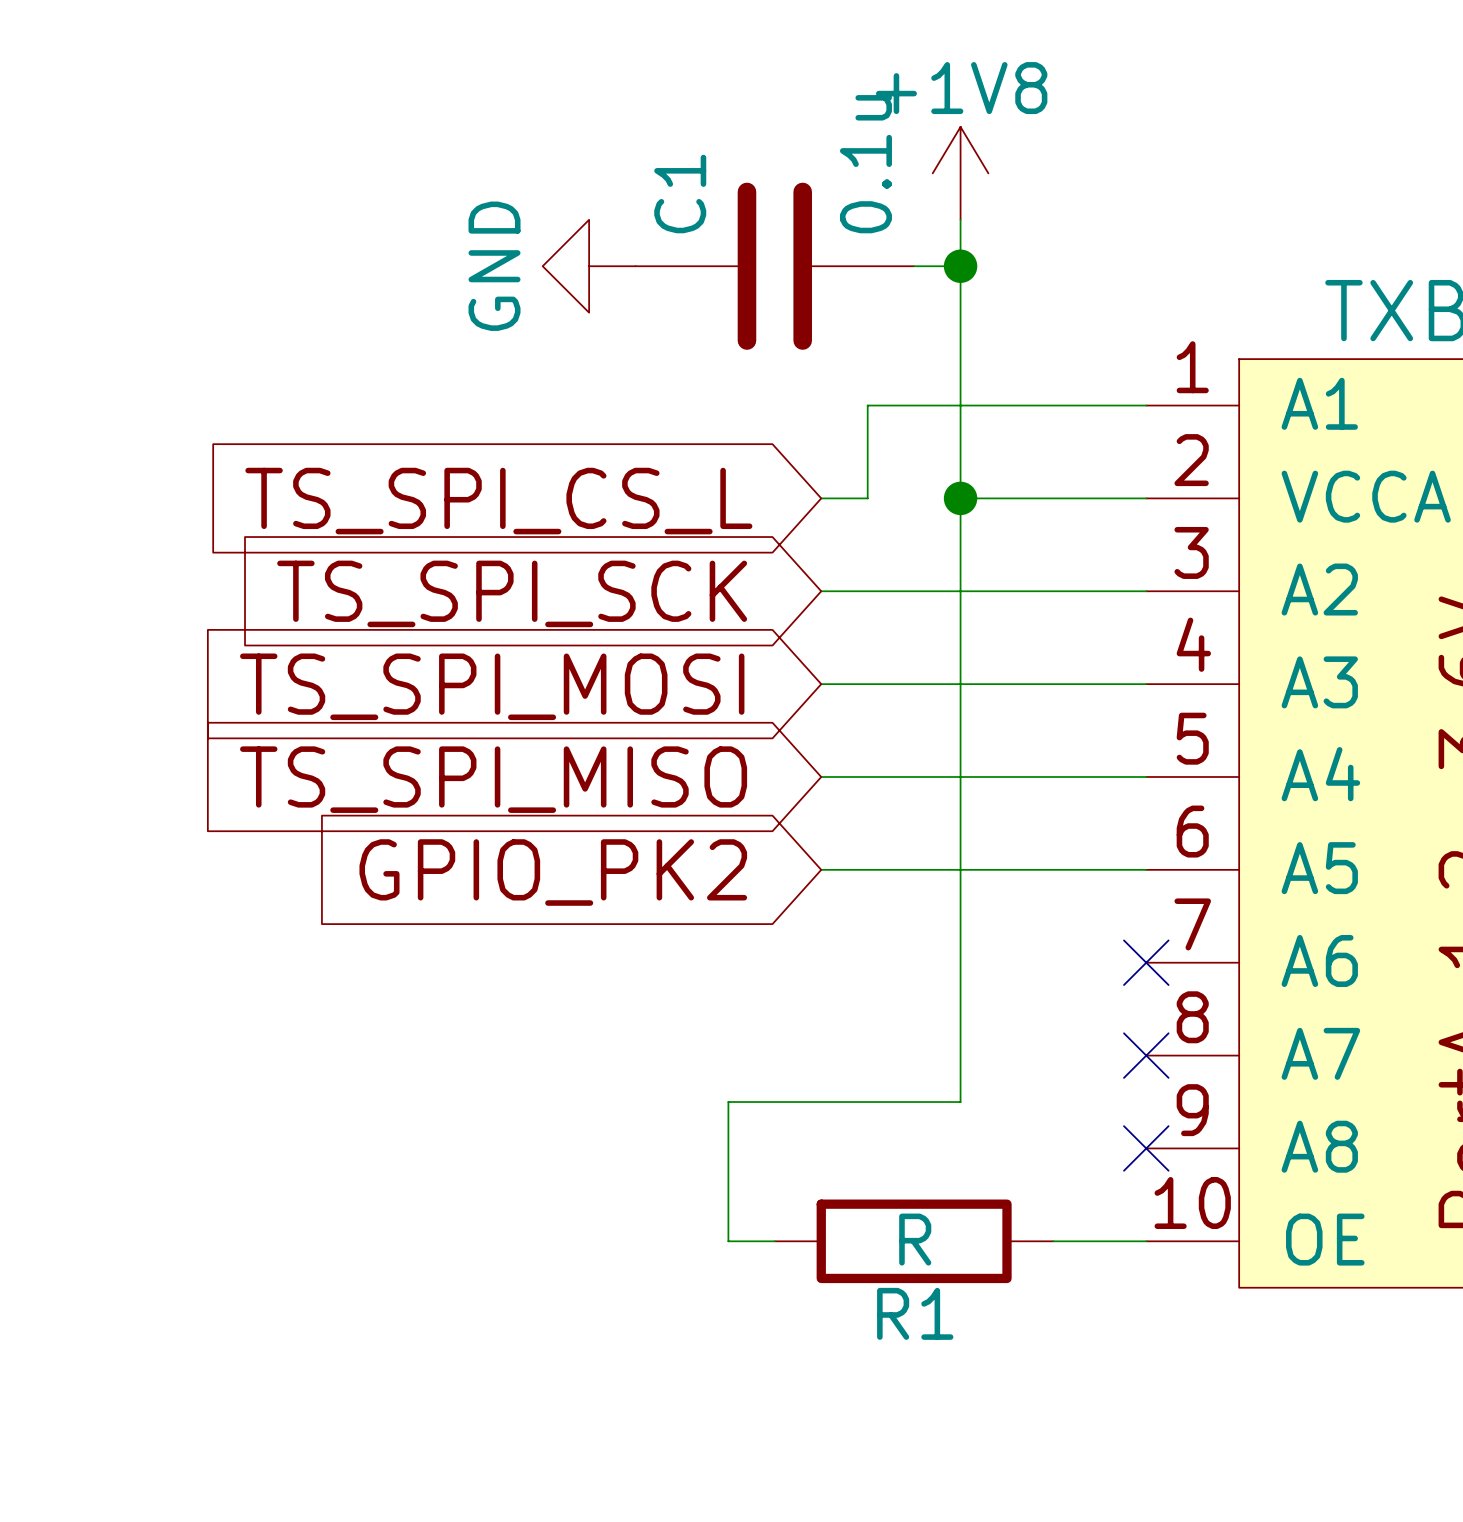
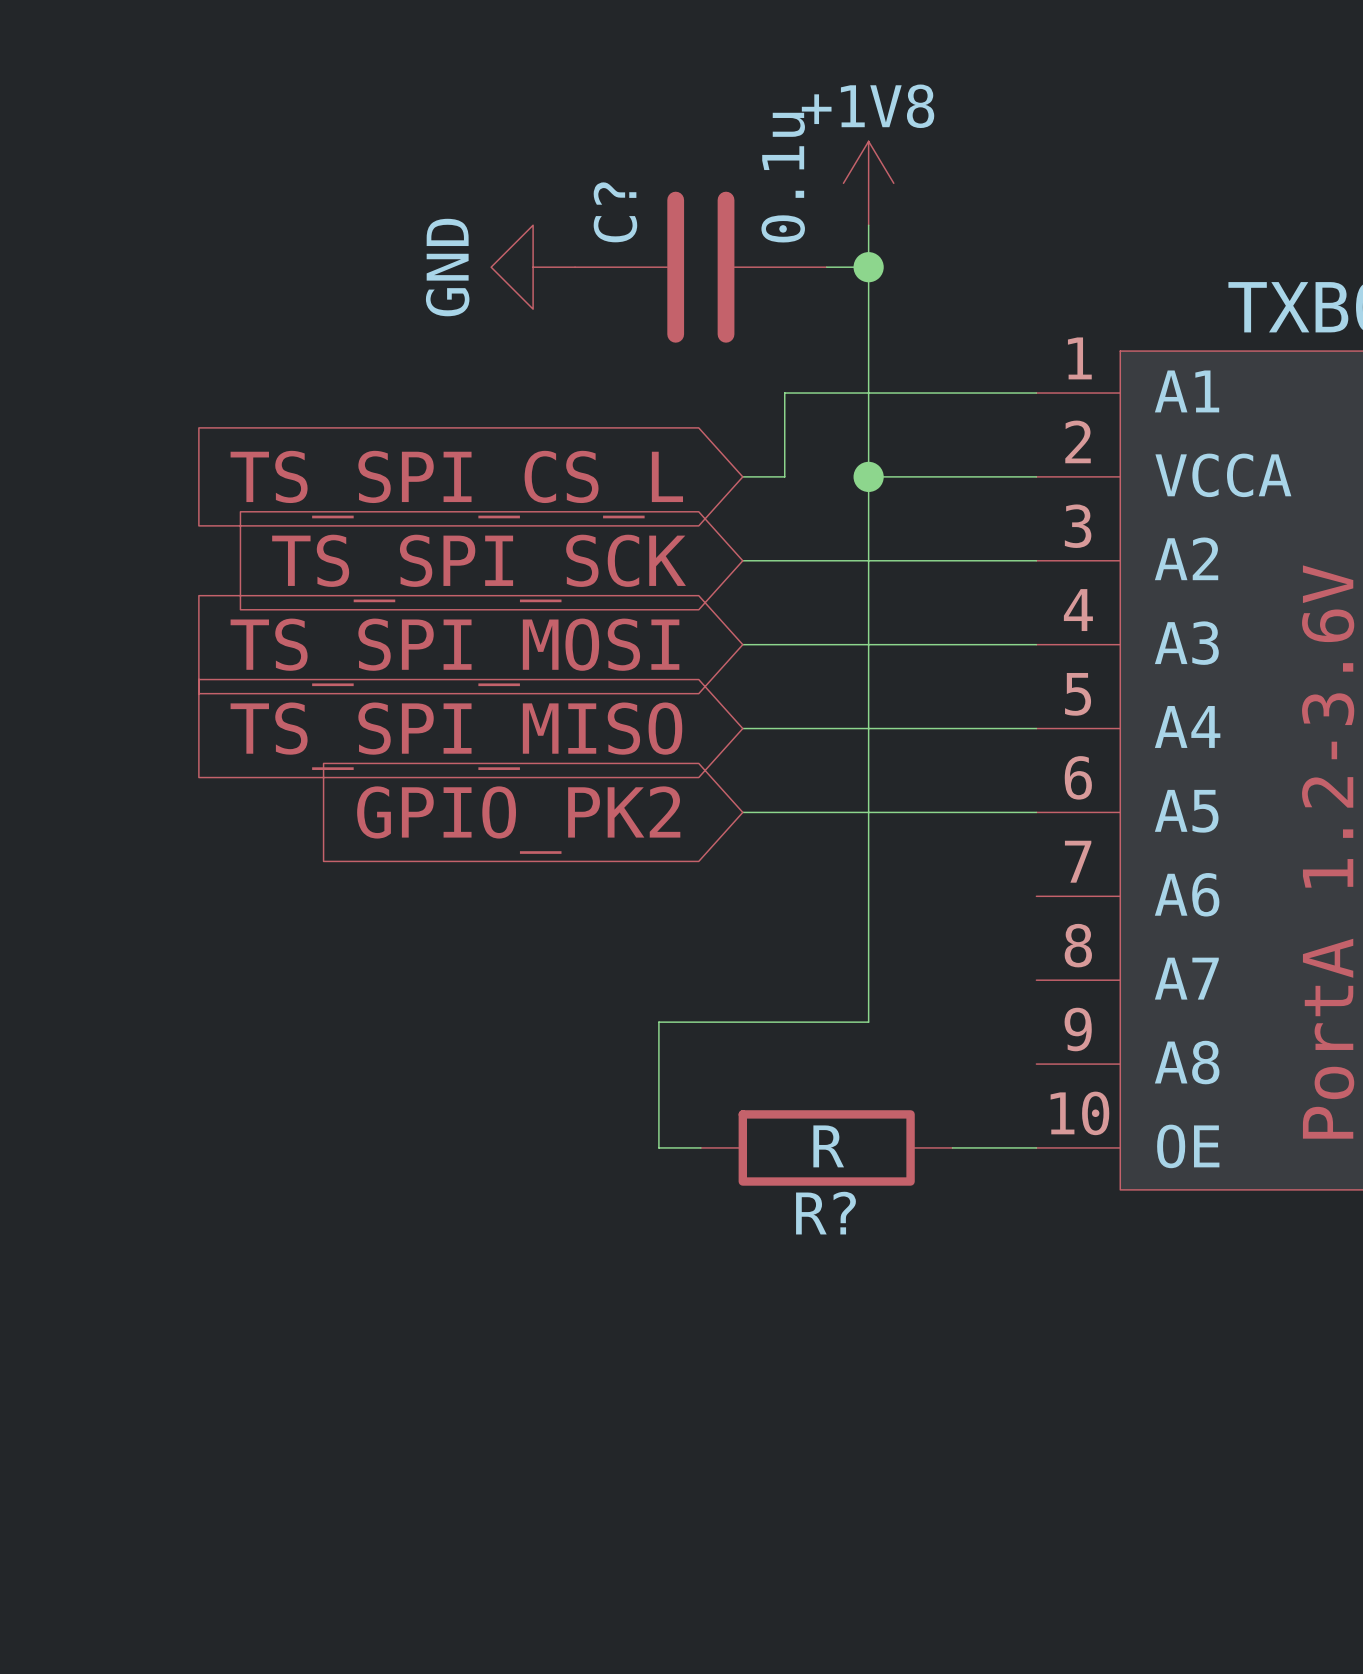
C1 name: C1 (680, 194) -> C? (615, 212)
no-connect mark: (1146, 962) -> none
no-connect mark: (1146, 1055) -> none
no-connect mark: (1146, 1148) -> none
R1 name: R1 (915, 1313) -> R? (825, 1213)

